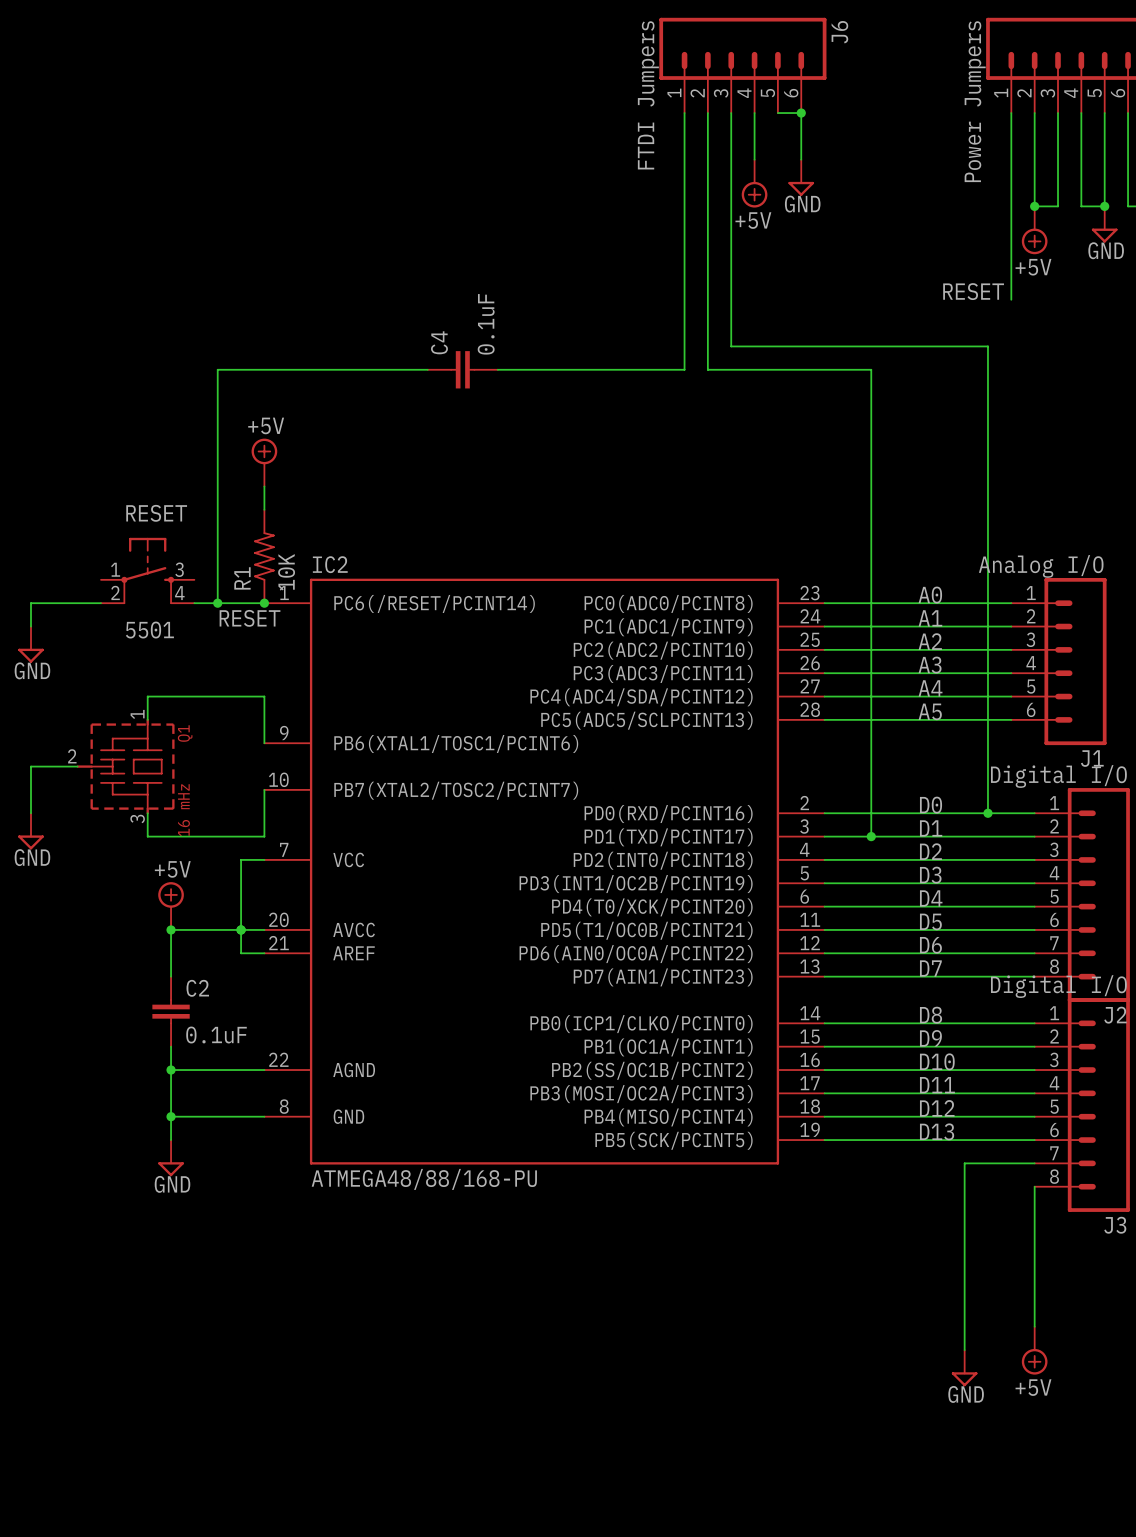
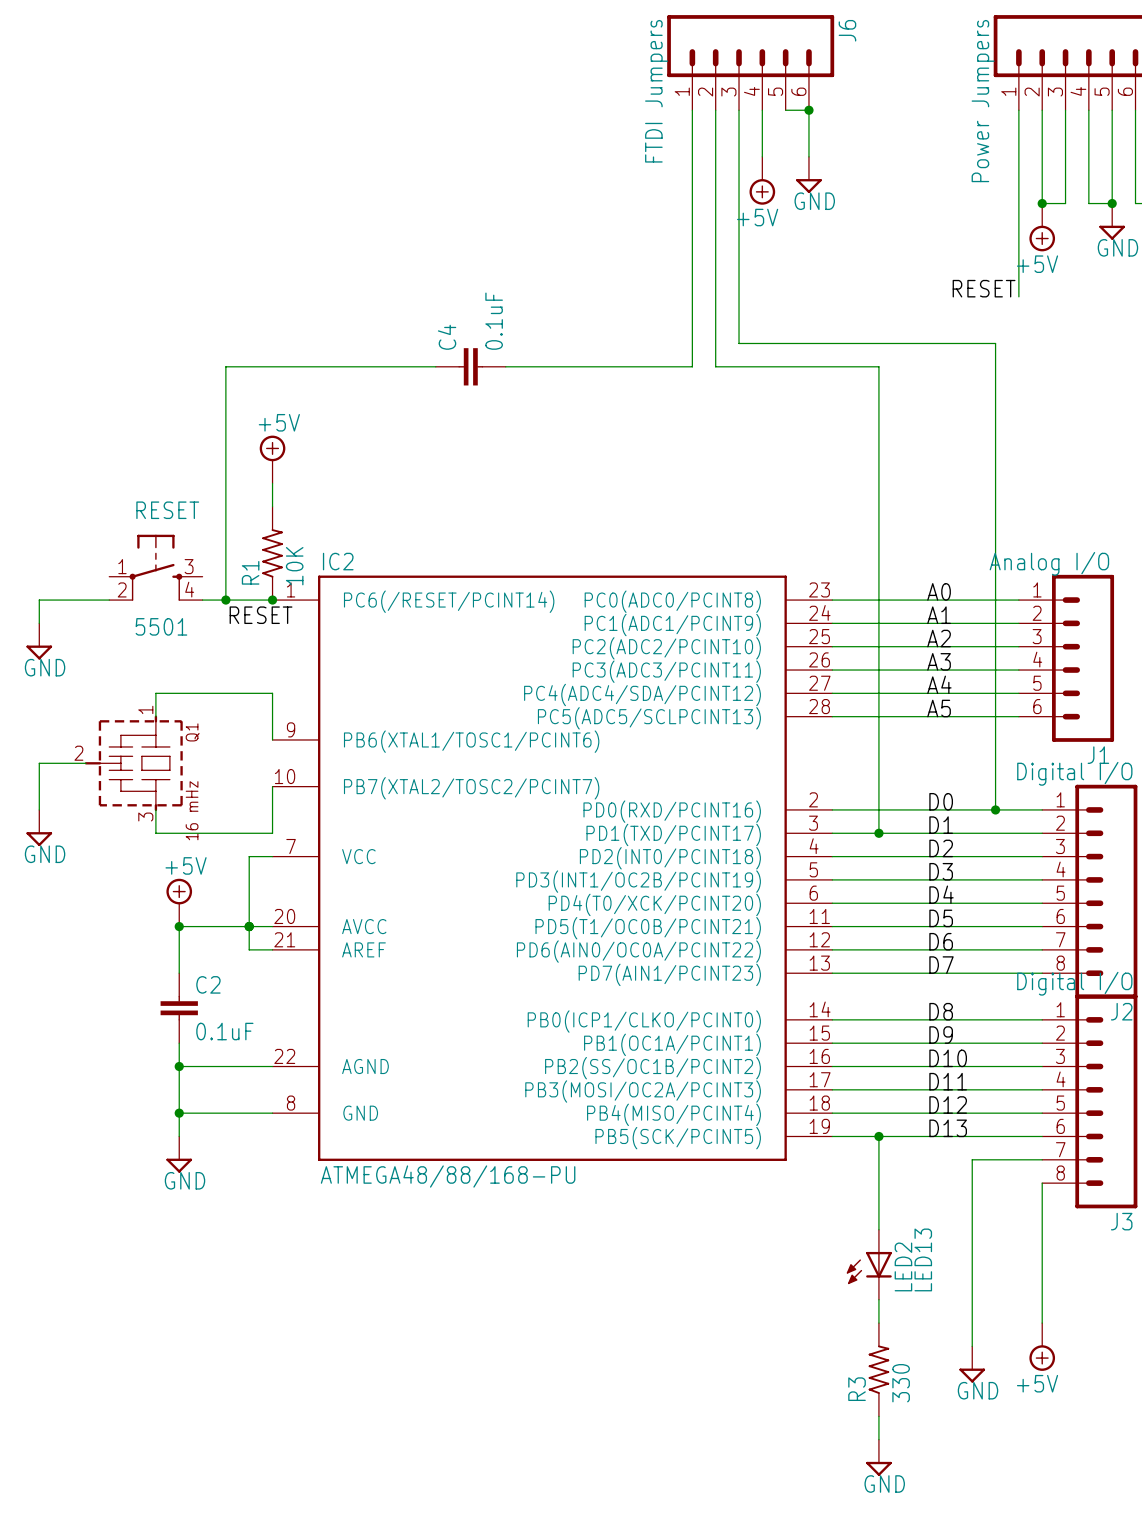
wire: none -> (878, 1136) (878, 1229)
junction: none -> (878, 1136)
LED2: none -> LED13 (869, 1264)
wire: none -> (878, 1299) (878, 1323)
R3: none -> 330 (878, 1369)
wire: none -> (878, 1416) (878, 1439)
power symbol: none -> GND (878, 1457)

